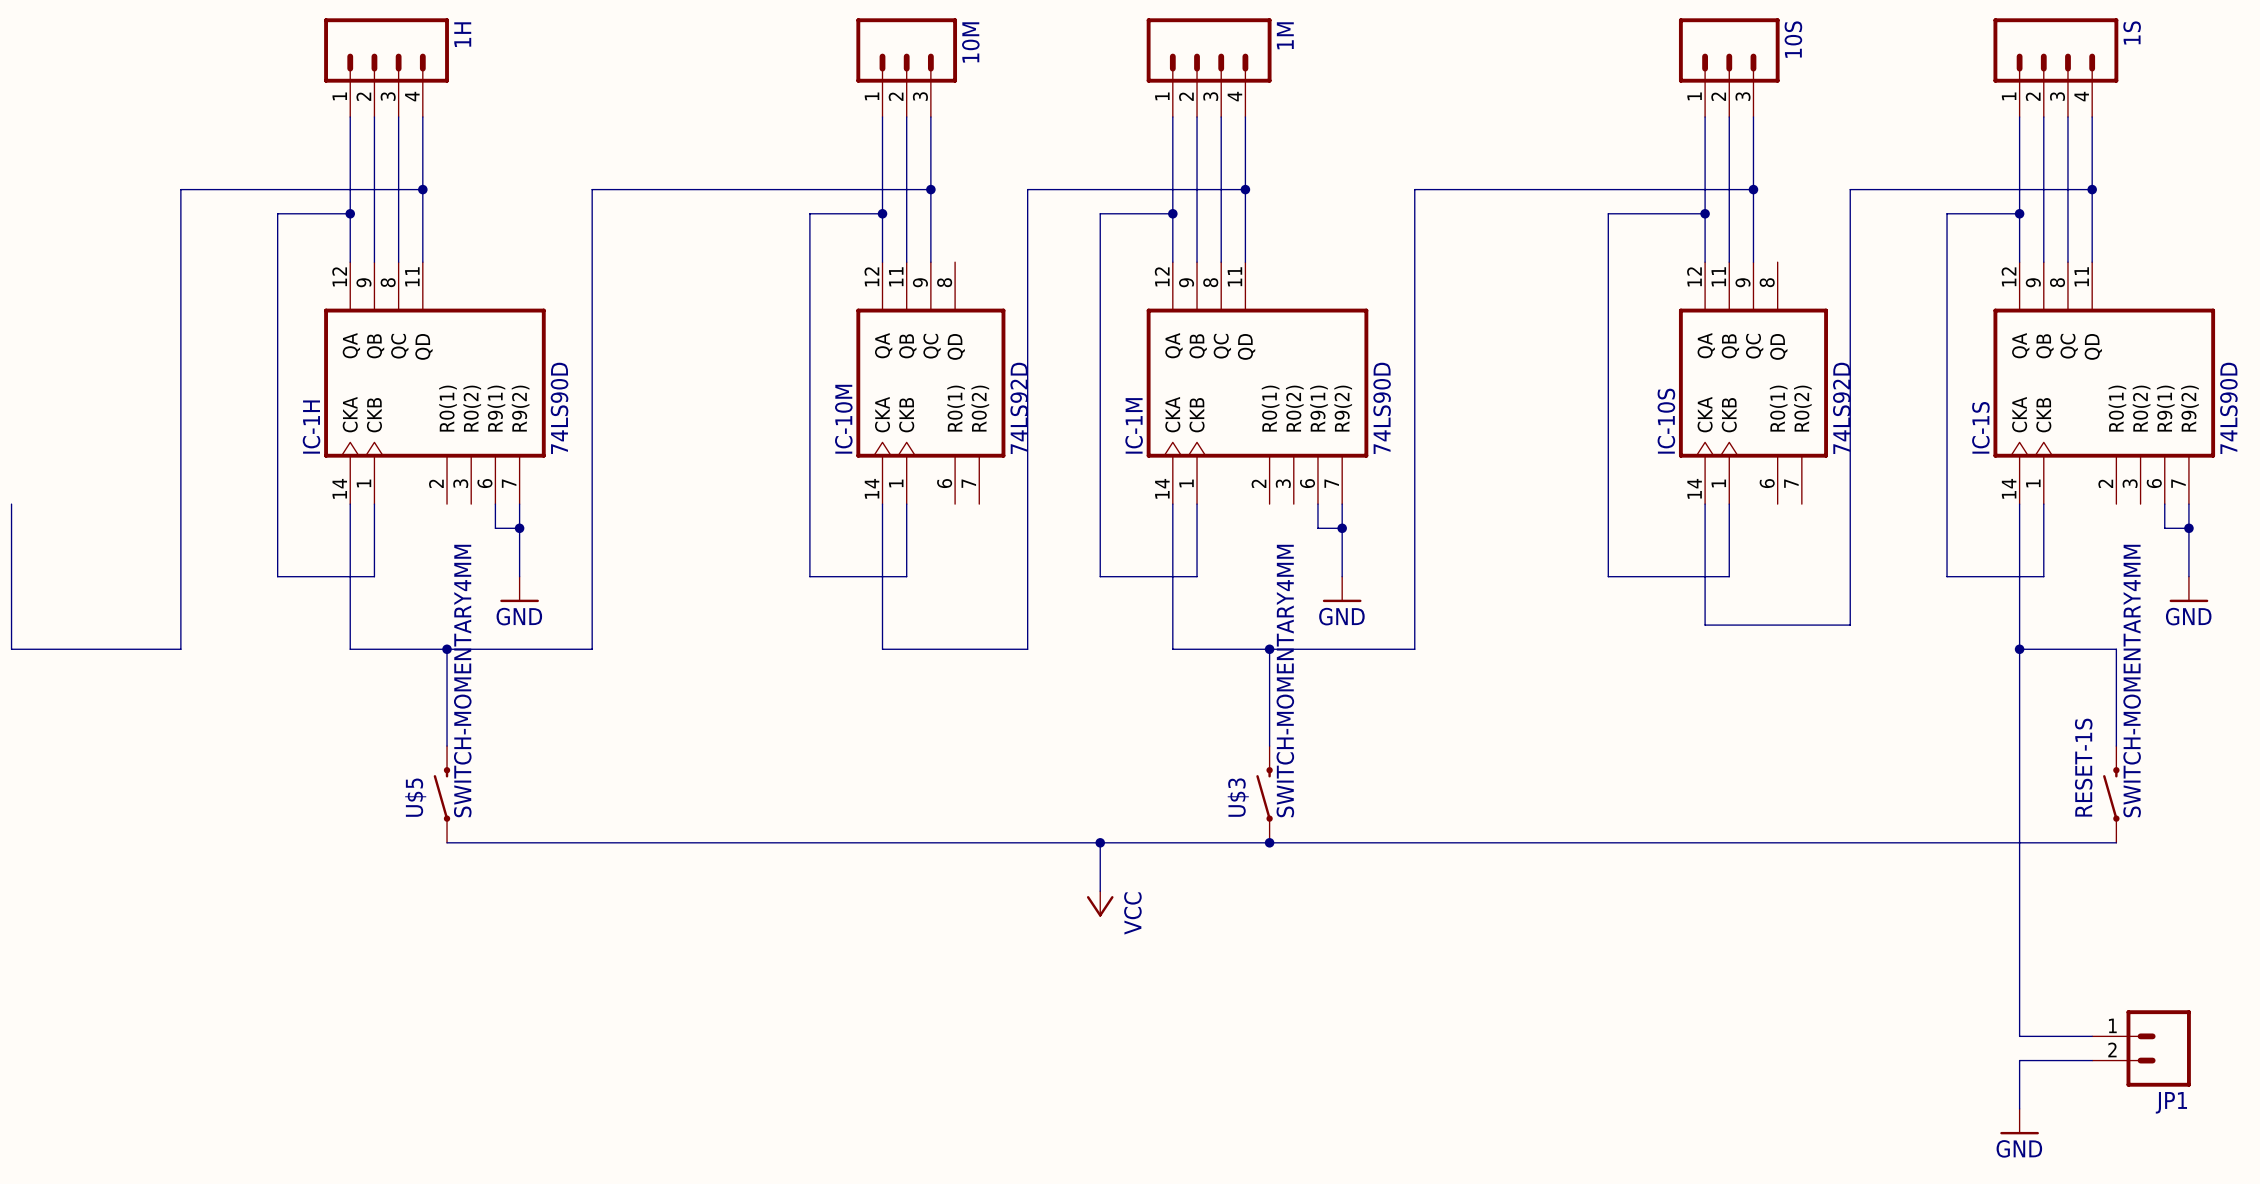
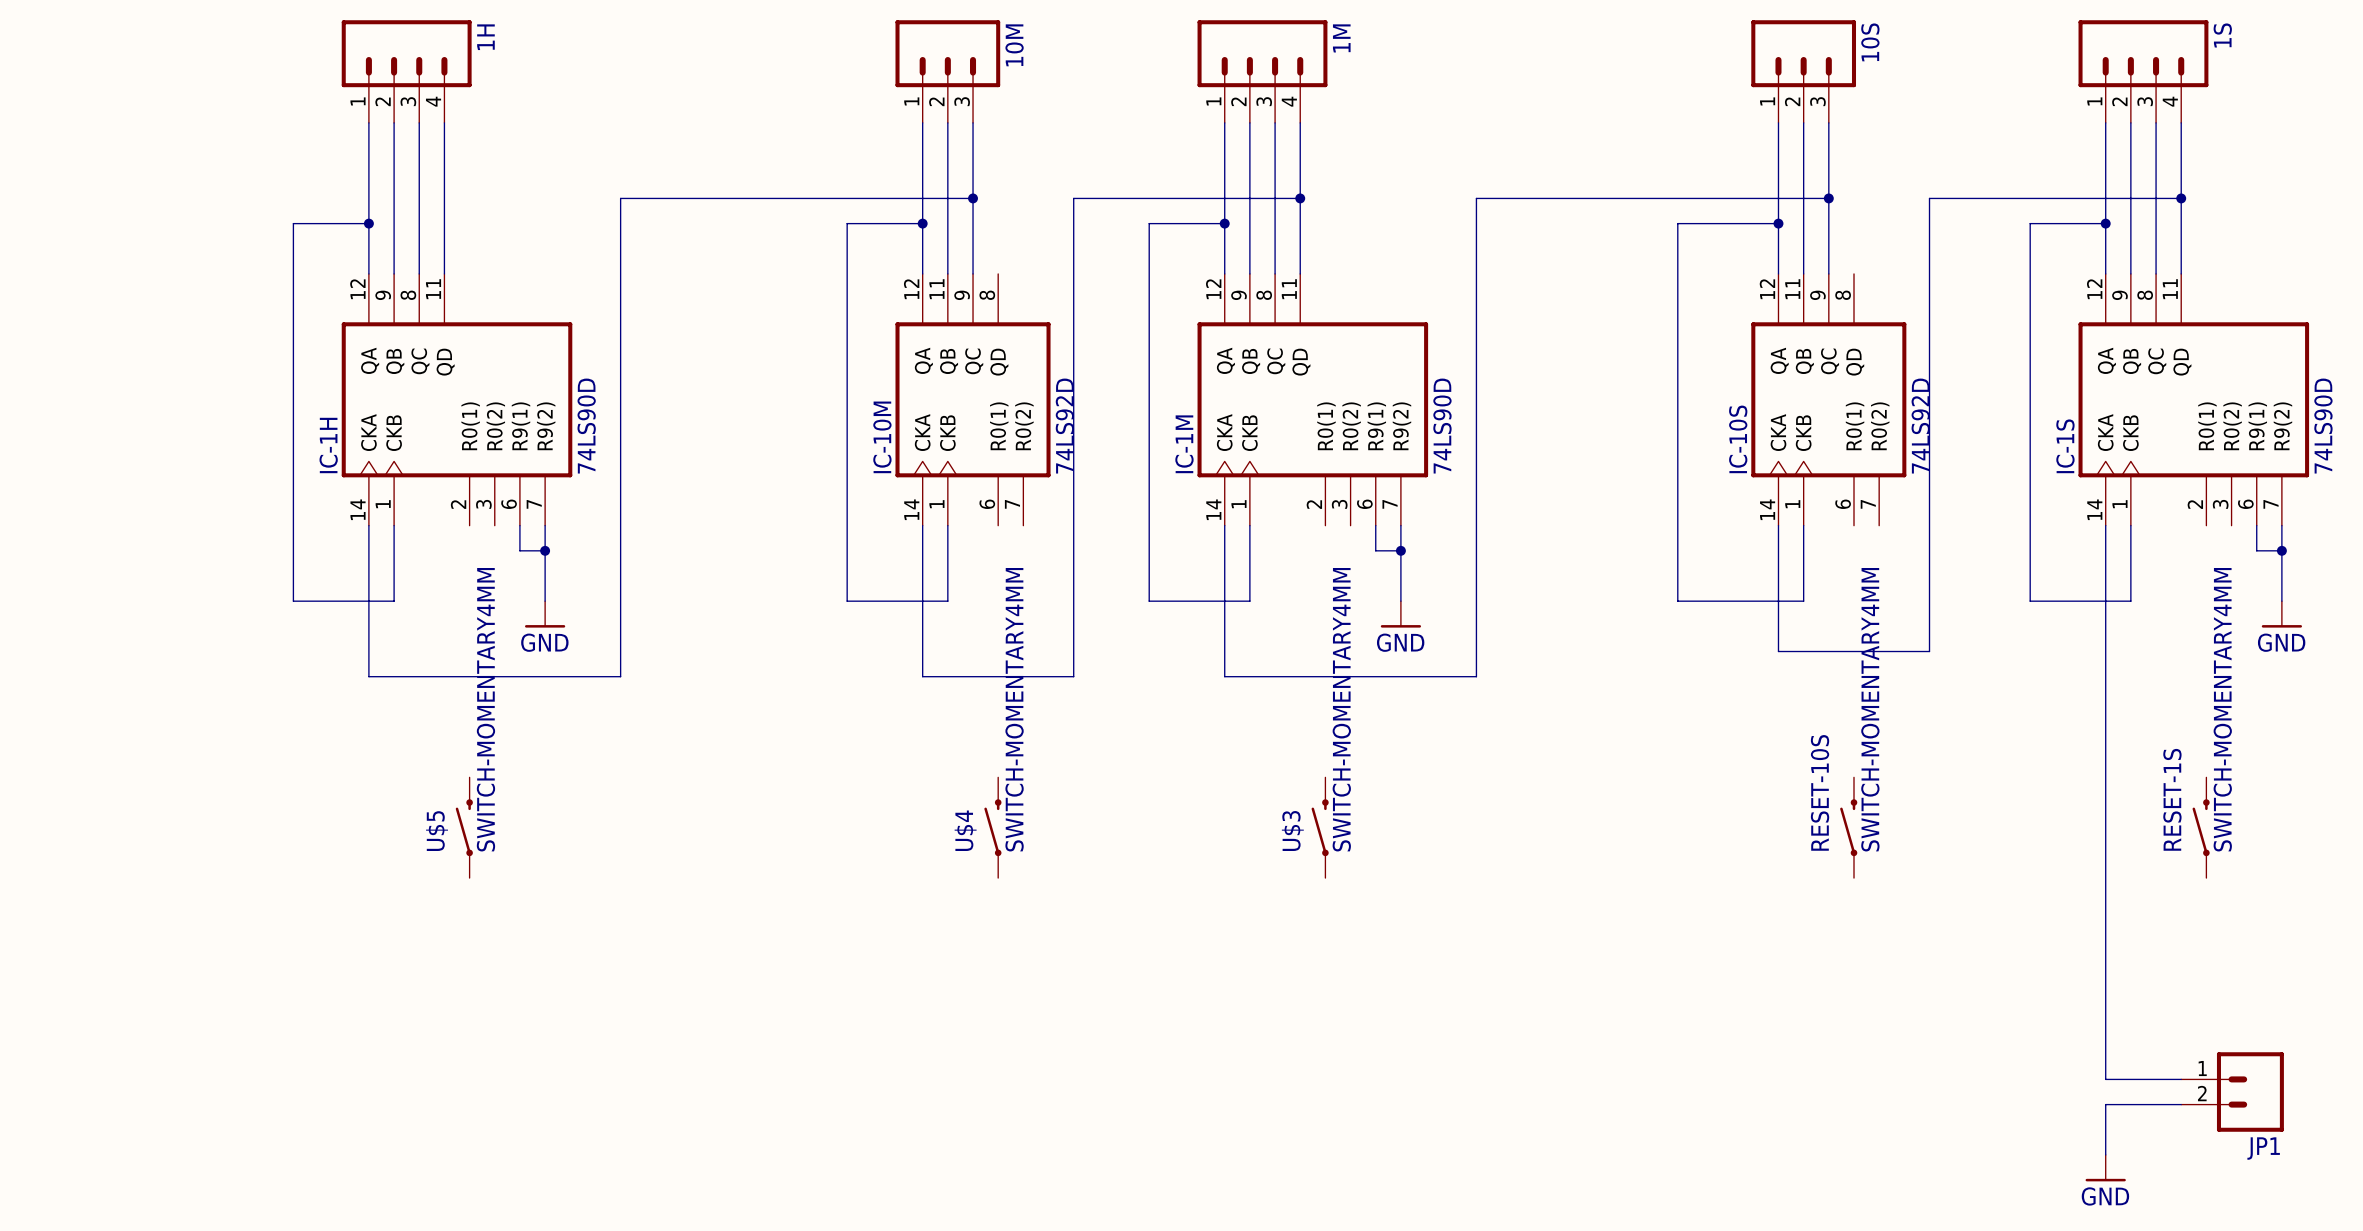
wire: (422, 189) (180, 189) (180, 649) (11, 649) (11, 504) -> none
junction: (422, 189) -> none
wire: (447, 649) (447, 746) -> none
junction: (447, 649) -> none
wire: (1269, 649) (1269, 746) -> none
junction: (1269, 649) -> none
wire: (2019, 649) (2116, 649) (2116, 746) -> none
junction: (2019, 649) -> none
U$4: none -> SWITCH-MOMENTARY4MM (992, 827)
RESET-10S: none -> SWITCH-MOMENTARY4MM (1848, 827)
wire: (447, 842) (2116, 842) -> none
wire: (1100, 842) (1100, 891) -> none
junction: (1100, 842) -> none
junction: (1269, 842) -> none
power symbol: VCC (1100, 903) -> none

